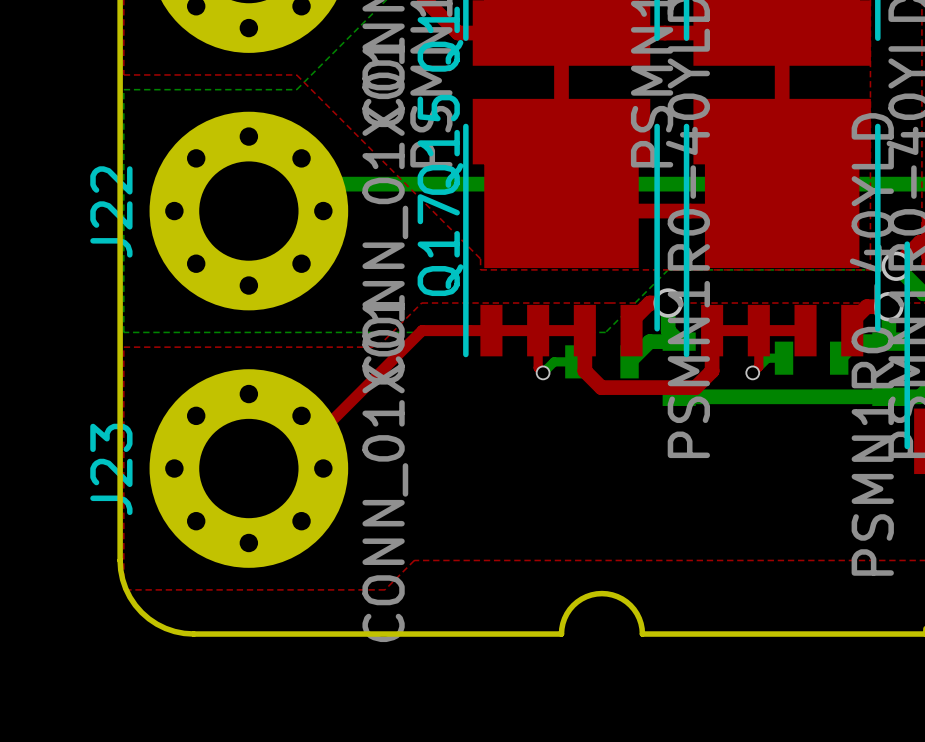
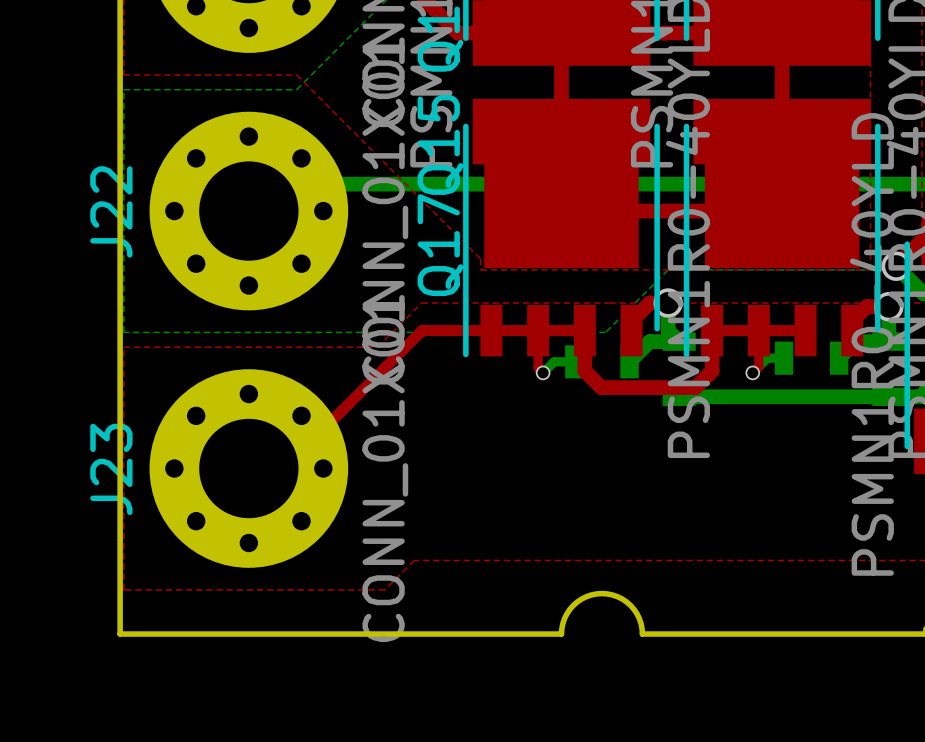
board edge: (120, 560) (125, 588) (141, 612) (165, 628) (193, 634) -> (120, 560) (120, 634) (193, 634)

